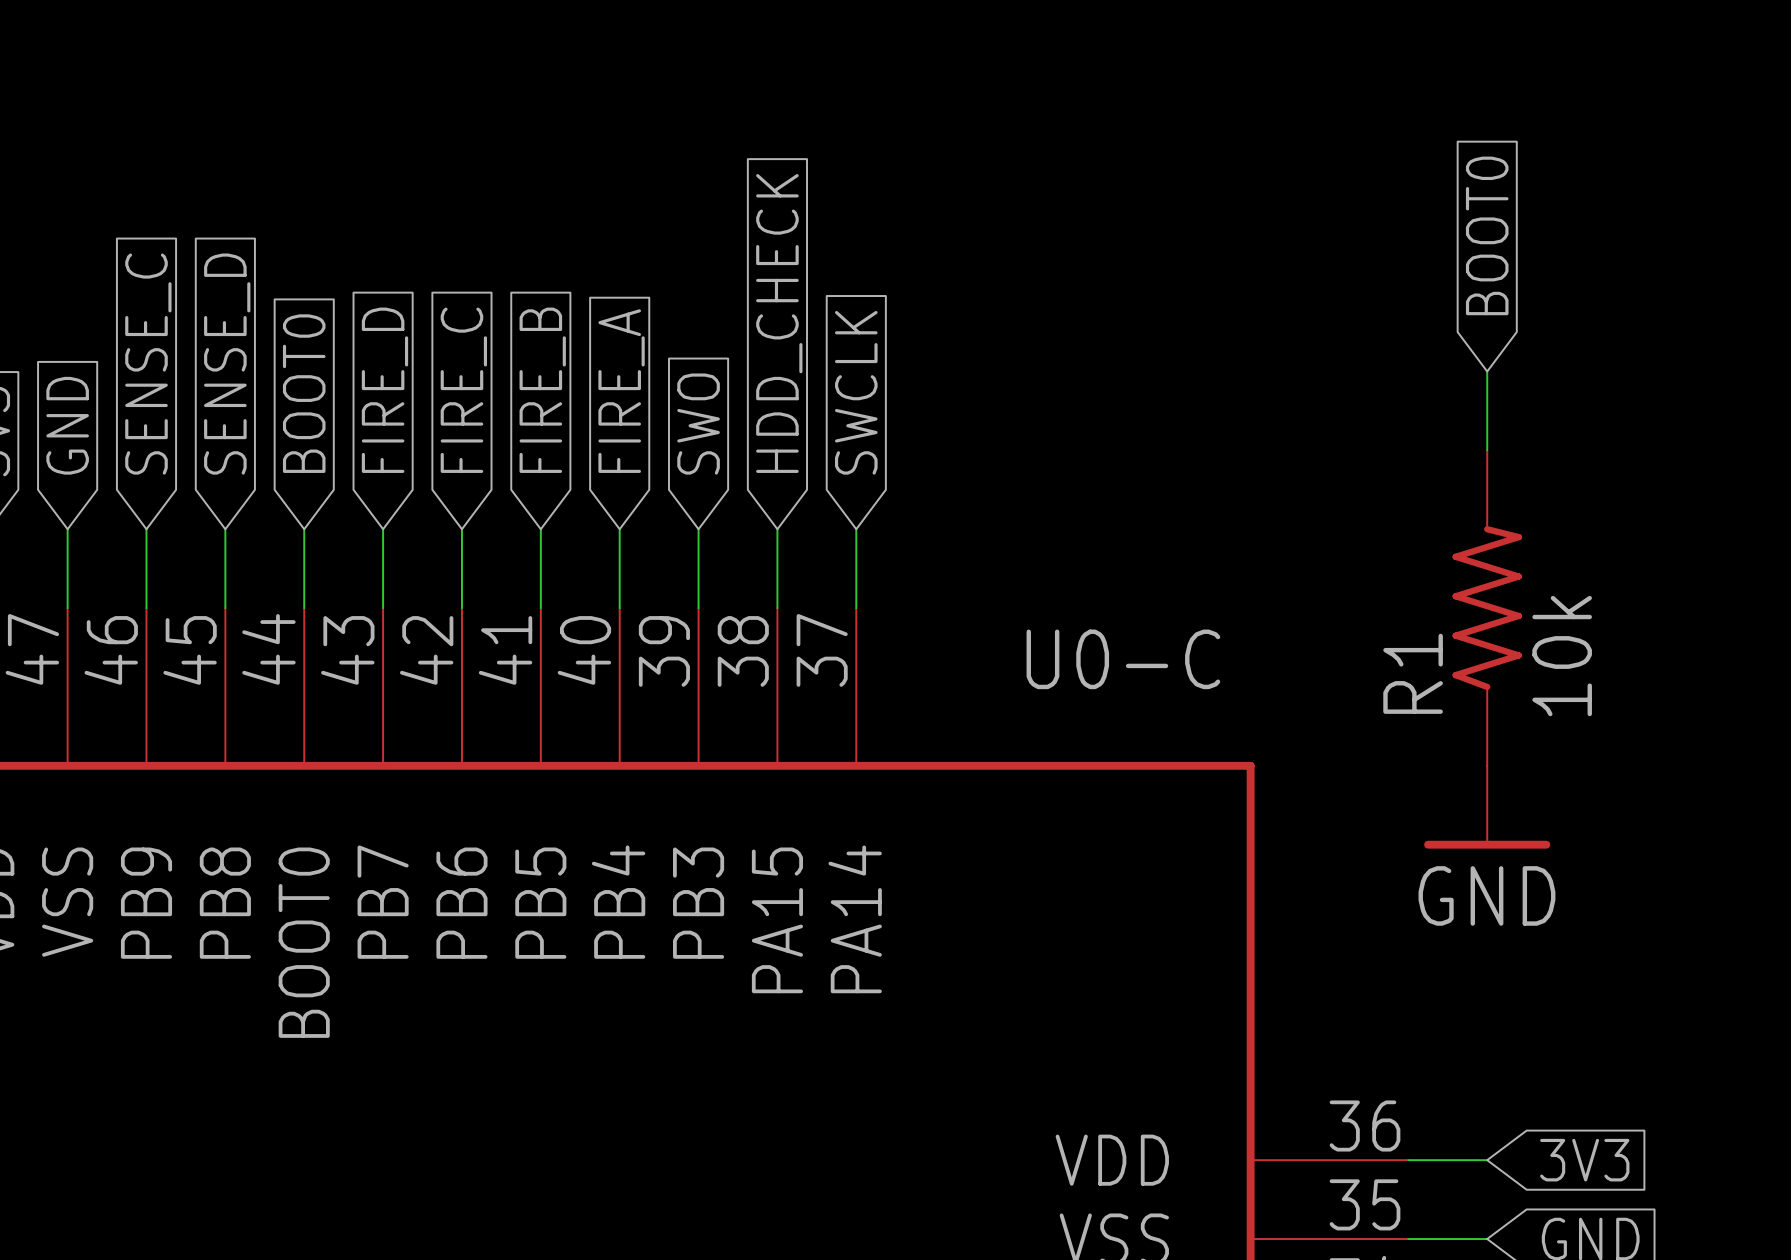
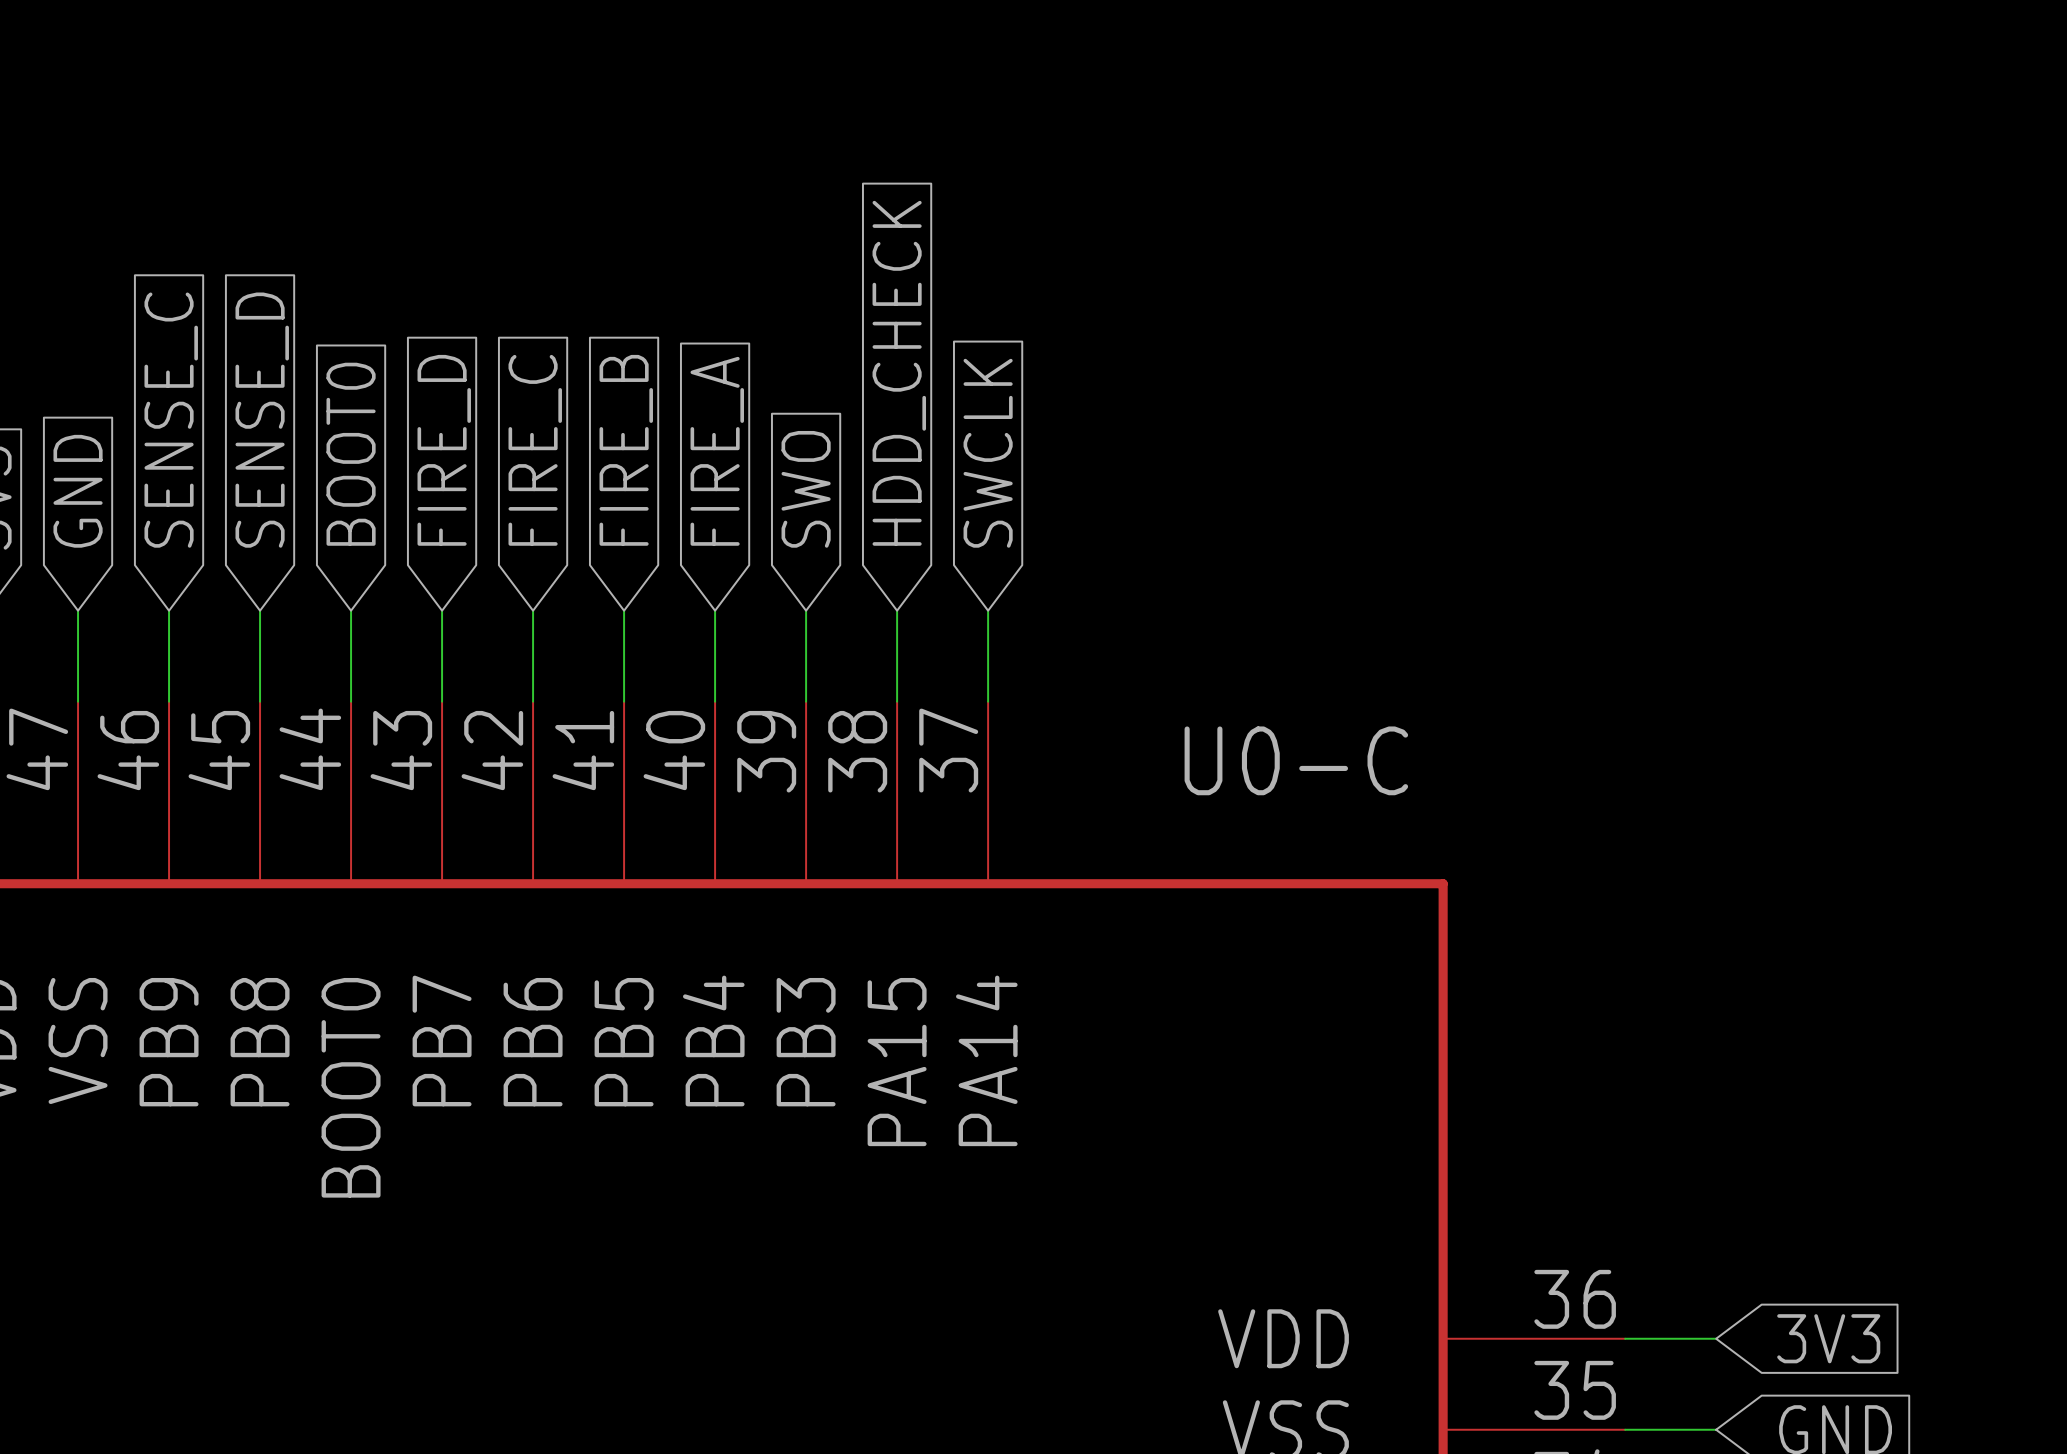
global label: BOOT0 (1487, 235) -> none
wire: (1487, 371) (1487, 450) -> none
R1: 10k (1487, 608) -> none
power symbol: GND (1487, 807) -> none

